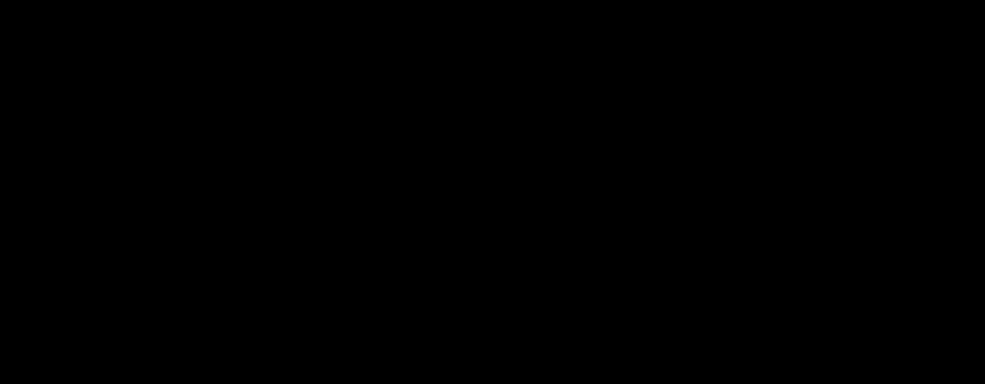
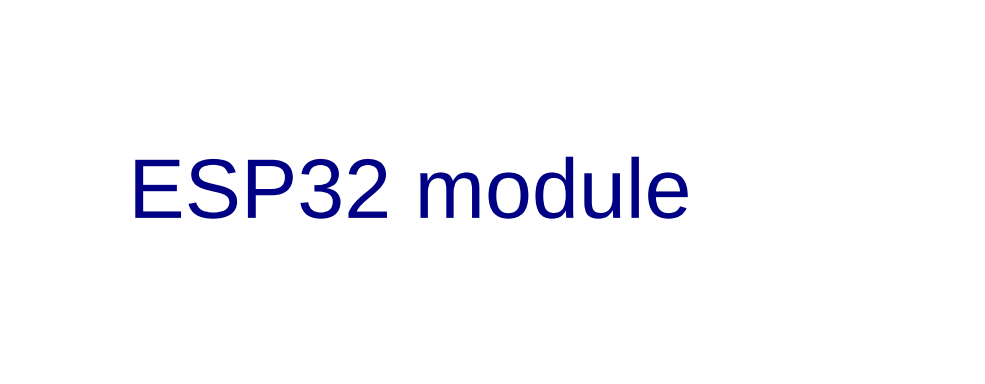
text: none -> ESP32 module (411, 187)

